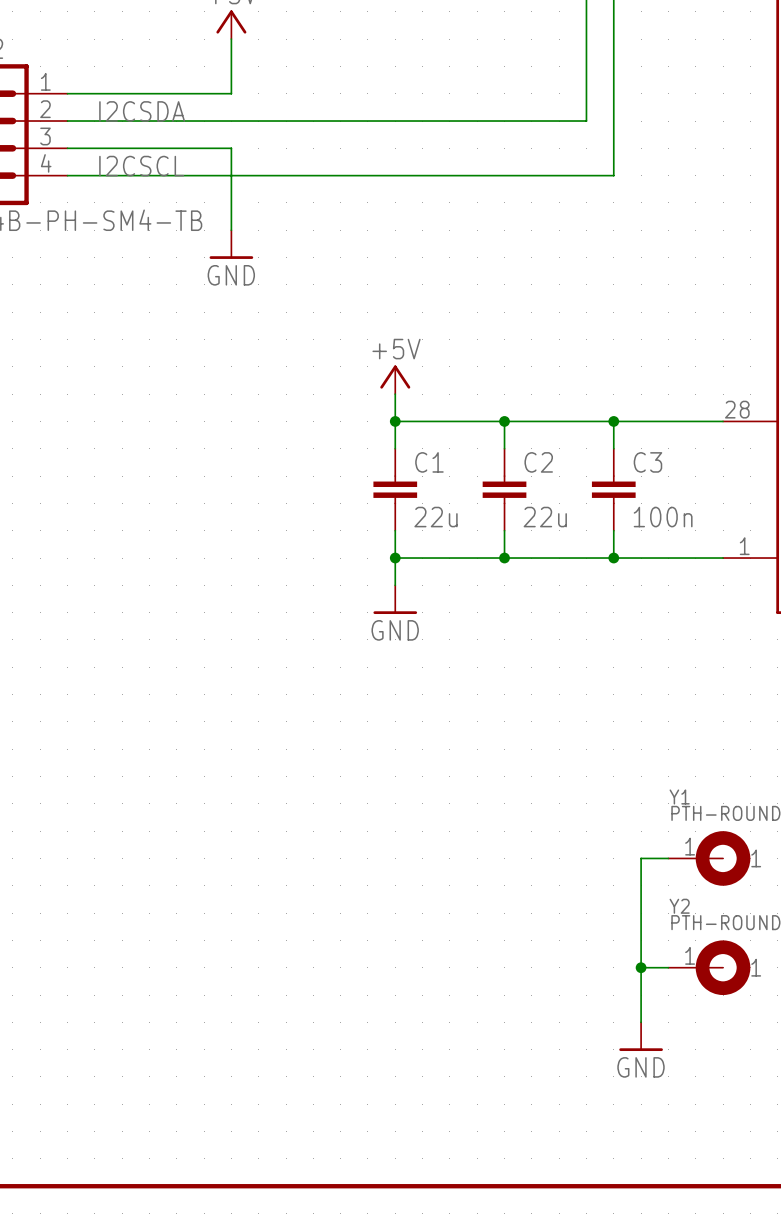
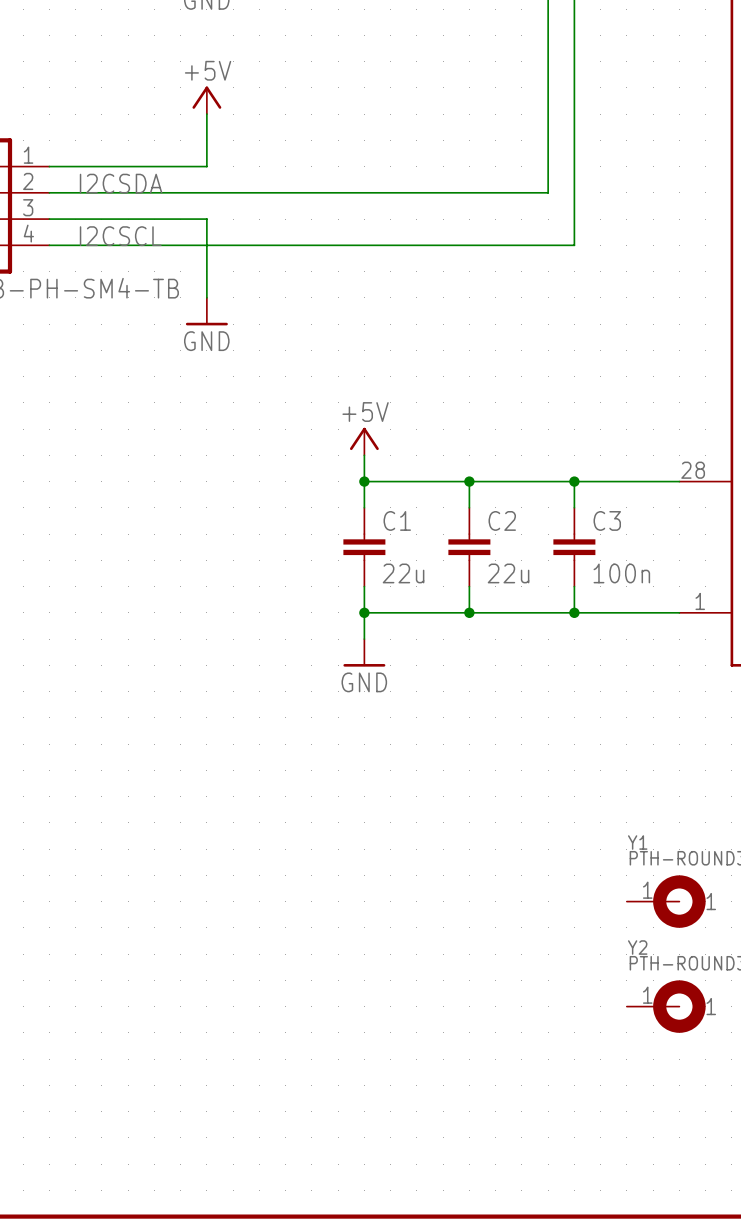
wire: (668, 858) (641, 858) (641, 1022) -> none
wire: (641, 967) (668, 967) -> none
junction: (641, 967) -> none
power symbol: GND (641, 1036) -> none

